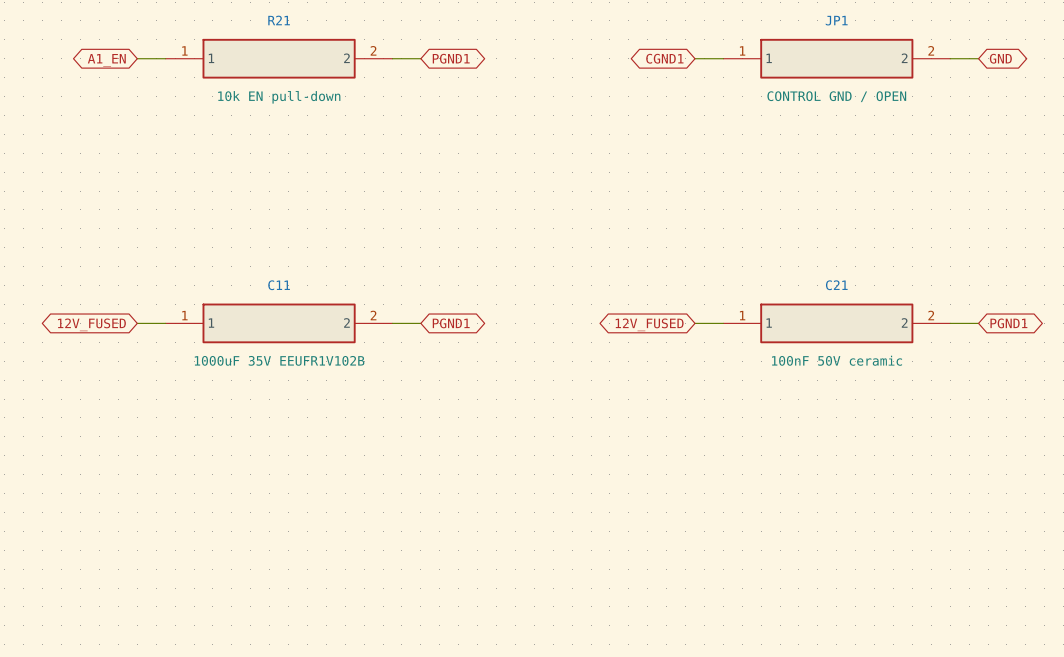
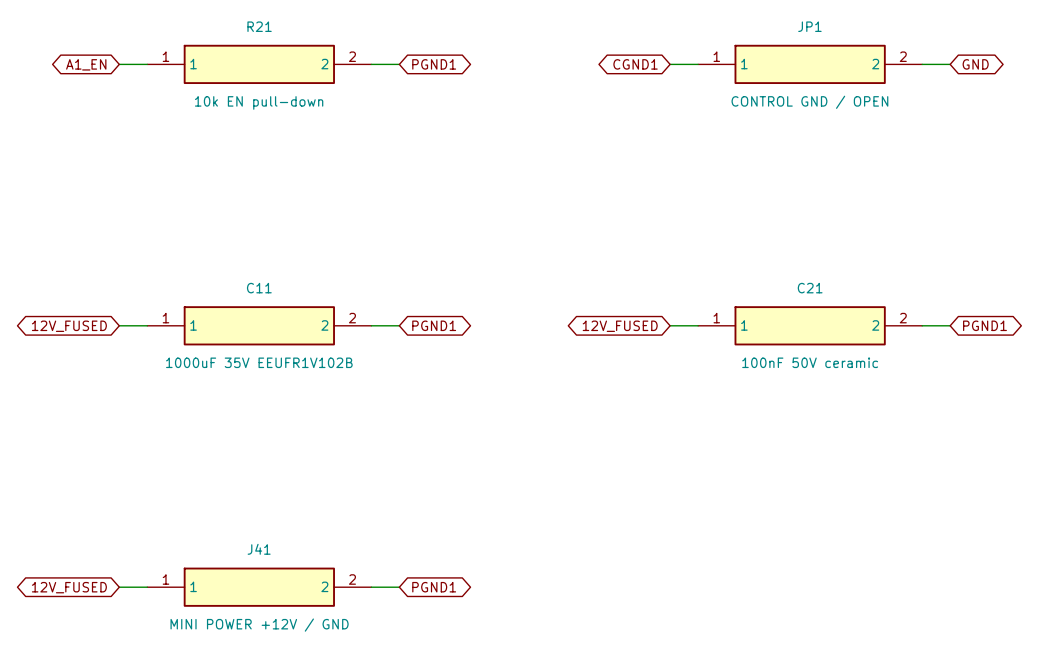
wire: none -> (119, 587) (147, 587)
J41: none -> MINI POWER +12V / GND (259, 587)
wire: none -> (371, 587) (399, 587)
global label: none -> PGND1 (434, 587)
global label: none -> 12V_FUSED (69, 587)

